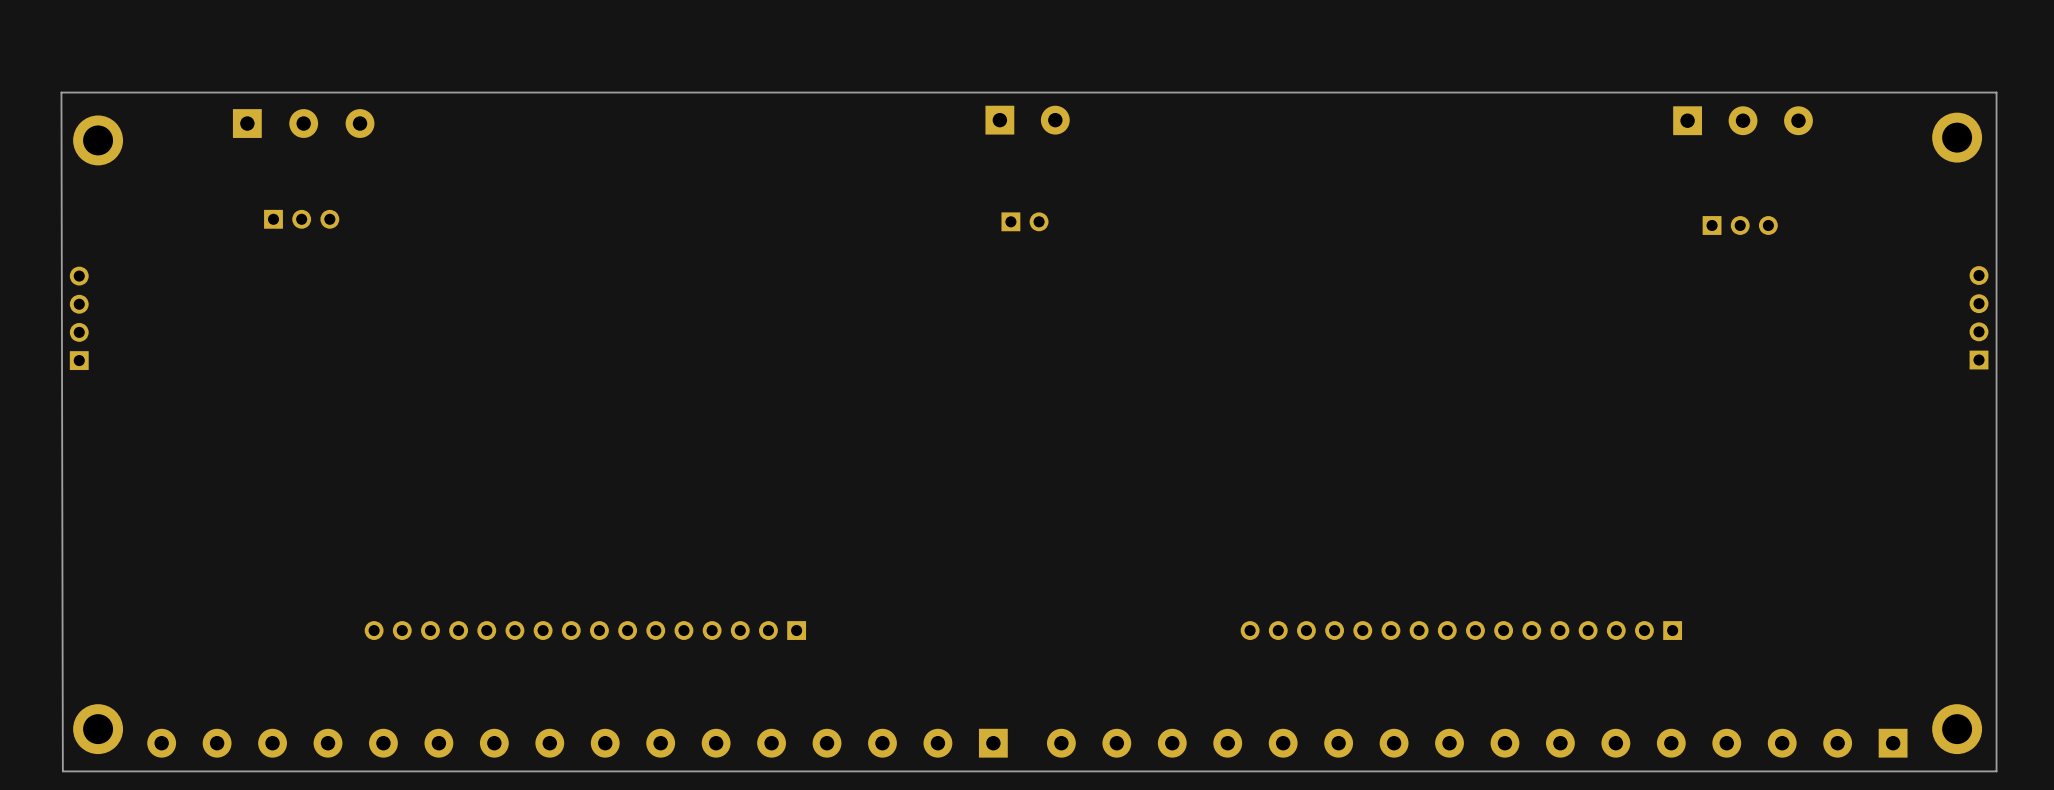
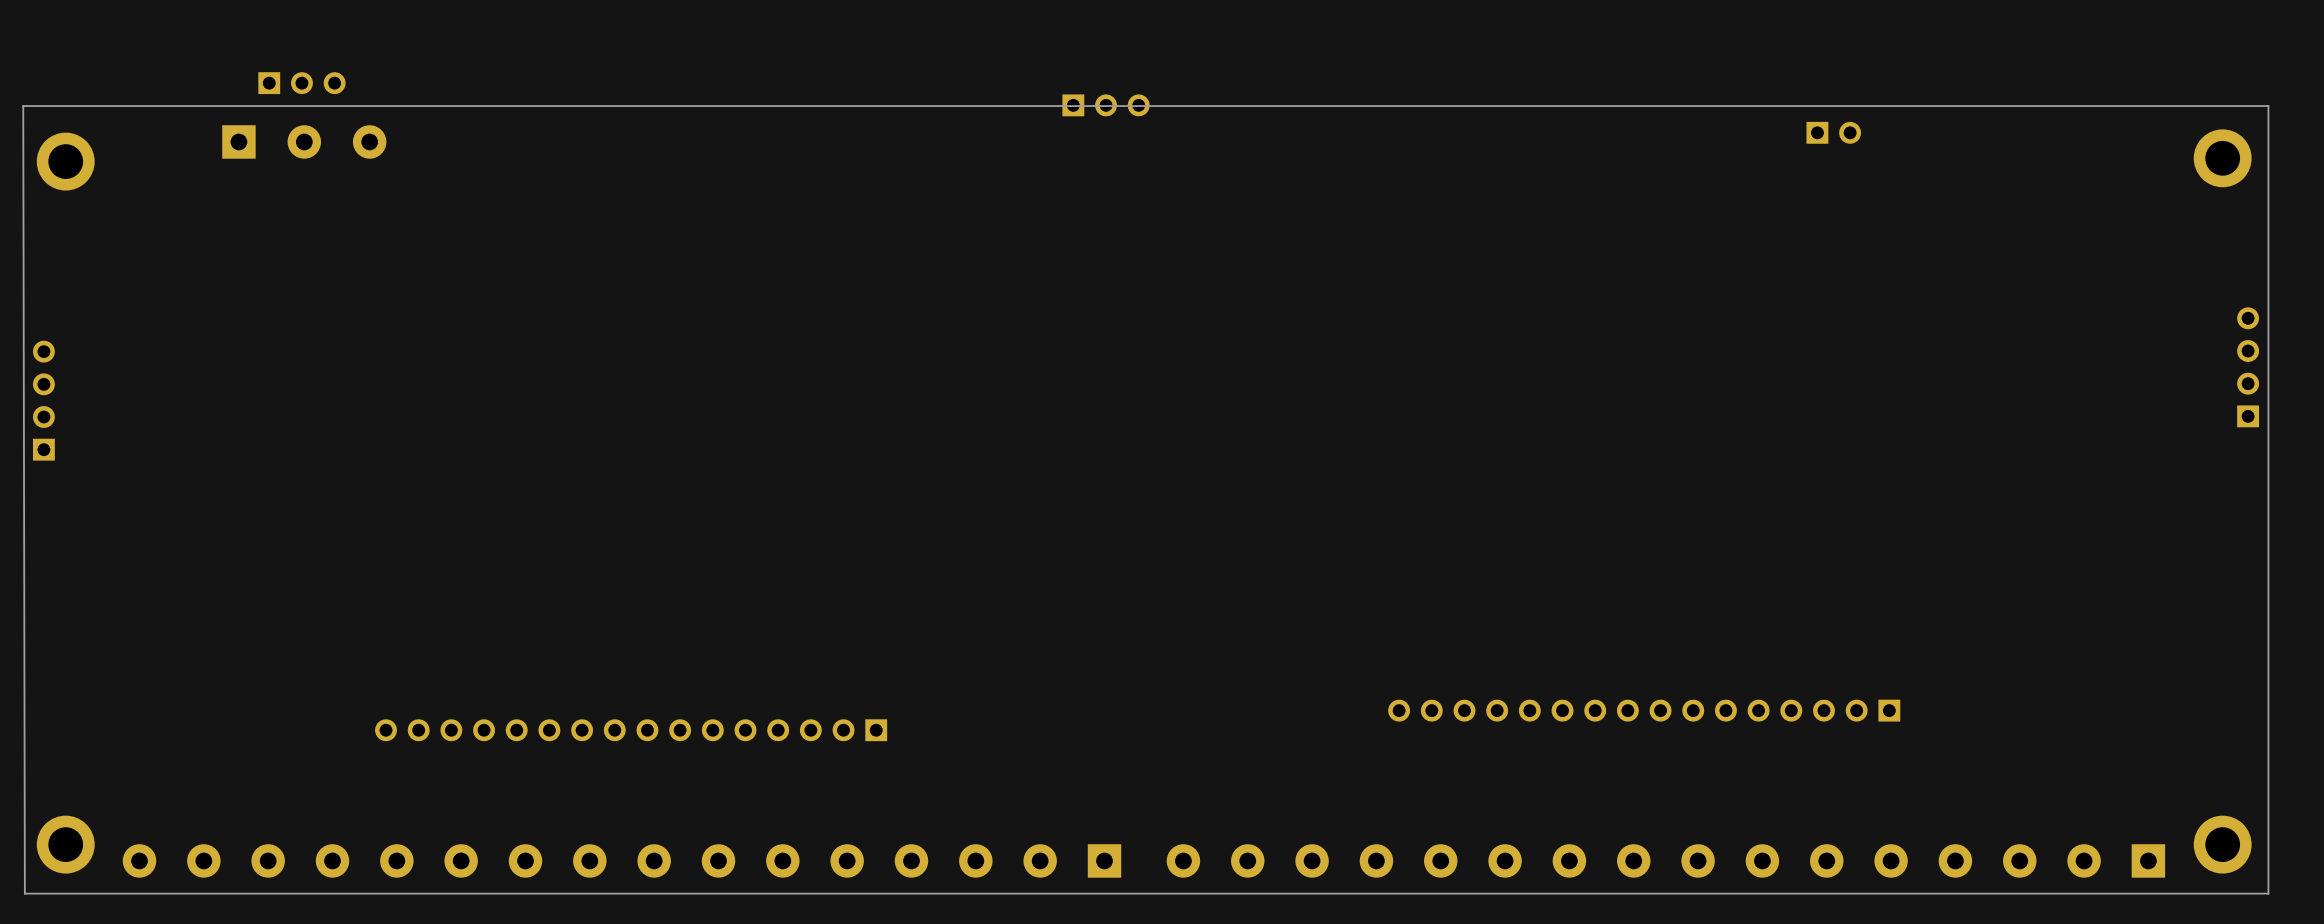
part: none -> (1106, 105)
part: none -> (1833, 132)
part: (1027, 120) -> none
part: (1743, 120) -> none
part position: (301, 219) -> (301, 83)
part: (1025, 221) -> none
part: (1740, 225) -> none
part position: (79, 318) -> (43, 400)
part position: (1461, 630) -> (1644, 710)

